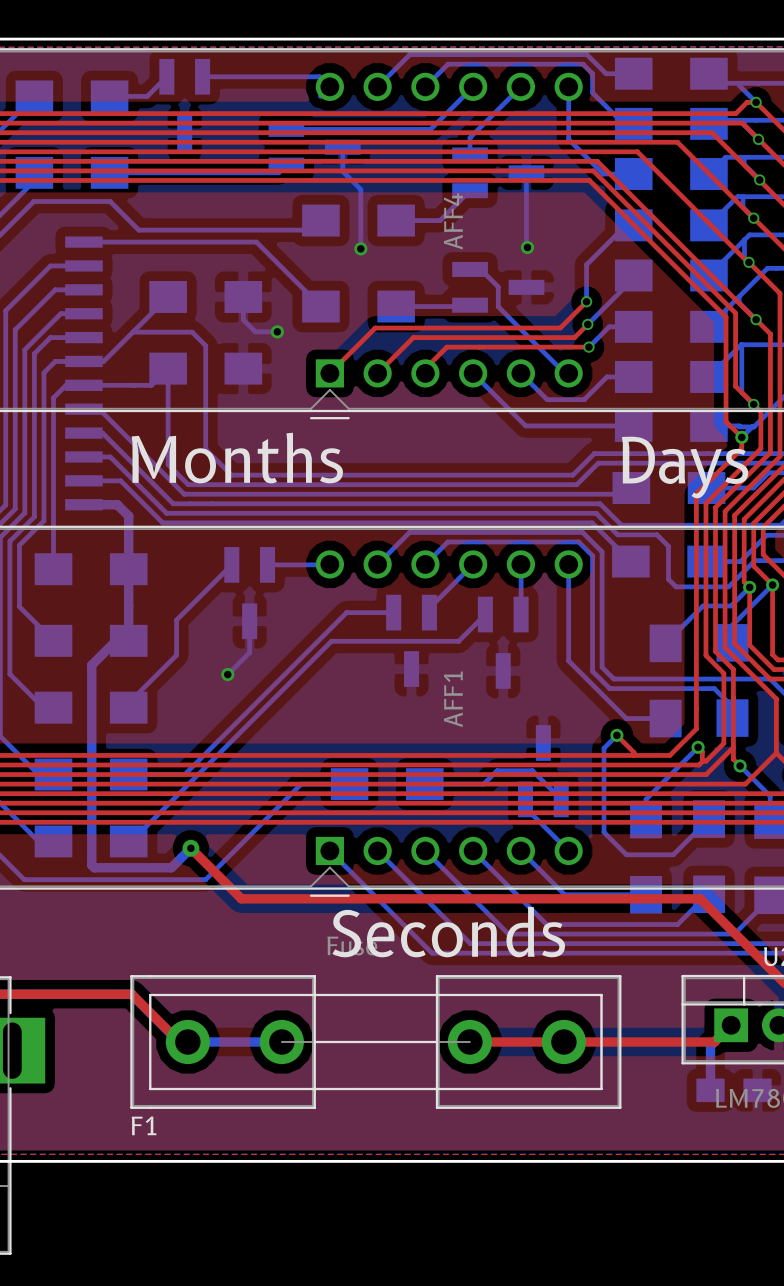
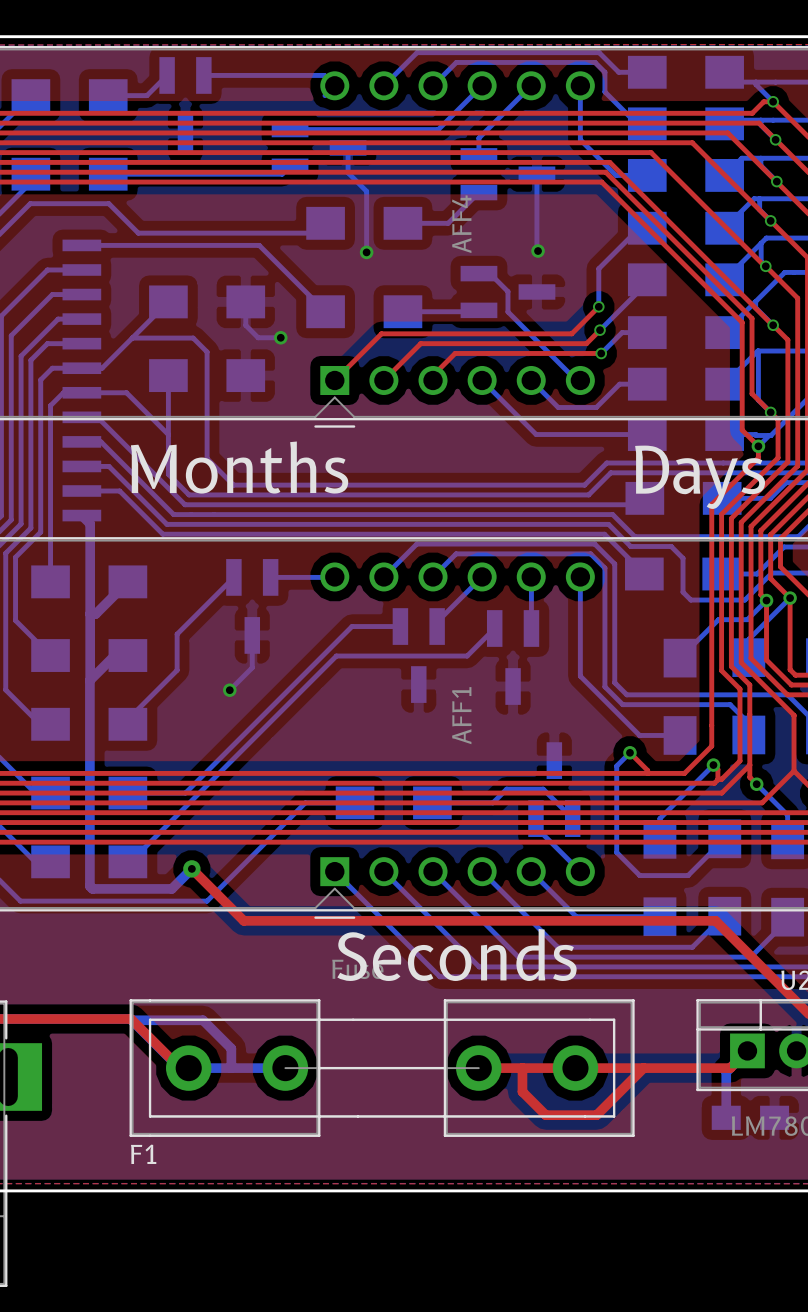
bottom track: (168, 368) (151, 385) (127, 385) -> (168, 434) (126, 392)
bottom track: (83, 504) (117, 504) (128, 516) (128, 640) -> (81, 515) (90, 523) (90, 680)
bottom track: none -> (127, 581) (95, 613) (90, 613)
bottom track: none -> (131, 1020) (203, 1020) (231, 1048) (231, 1068)
top track: none -> (522, 1068) (522, 1091) (545, 1115) (596, 1115) (643, 1068)

